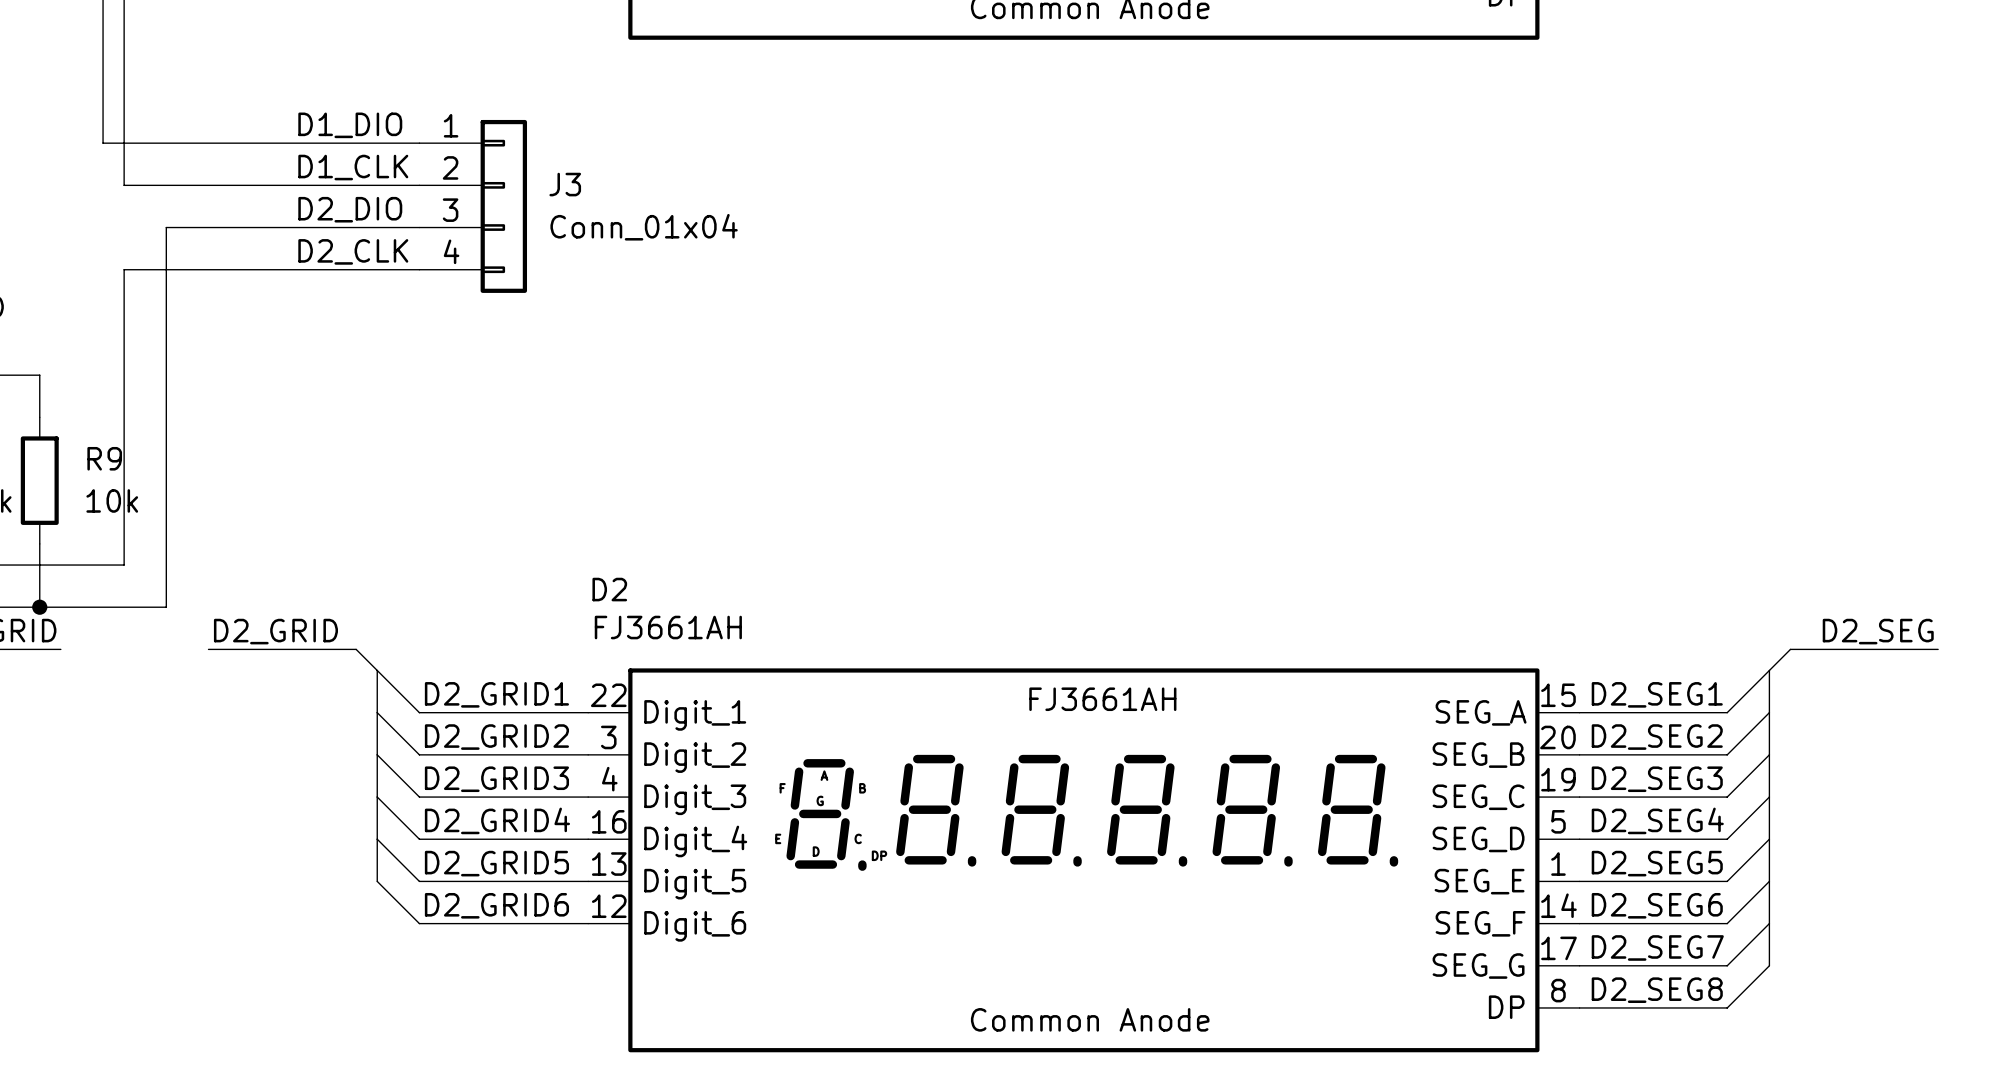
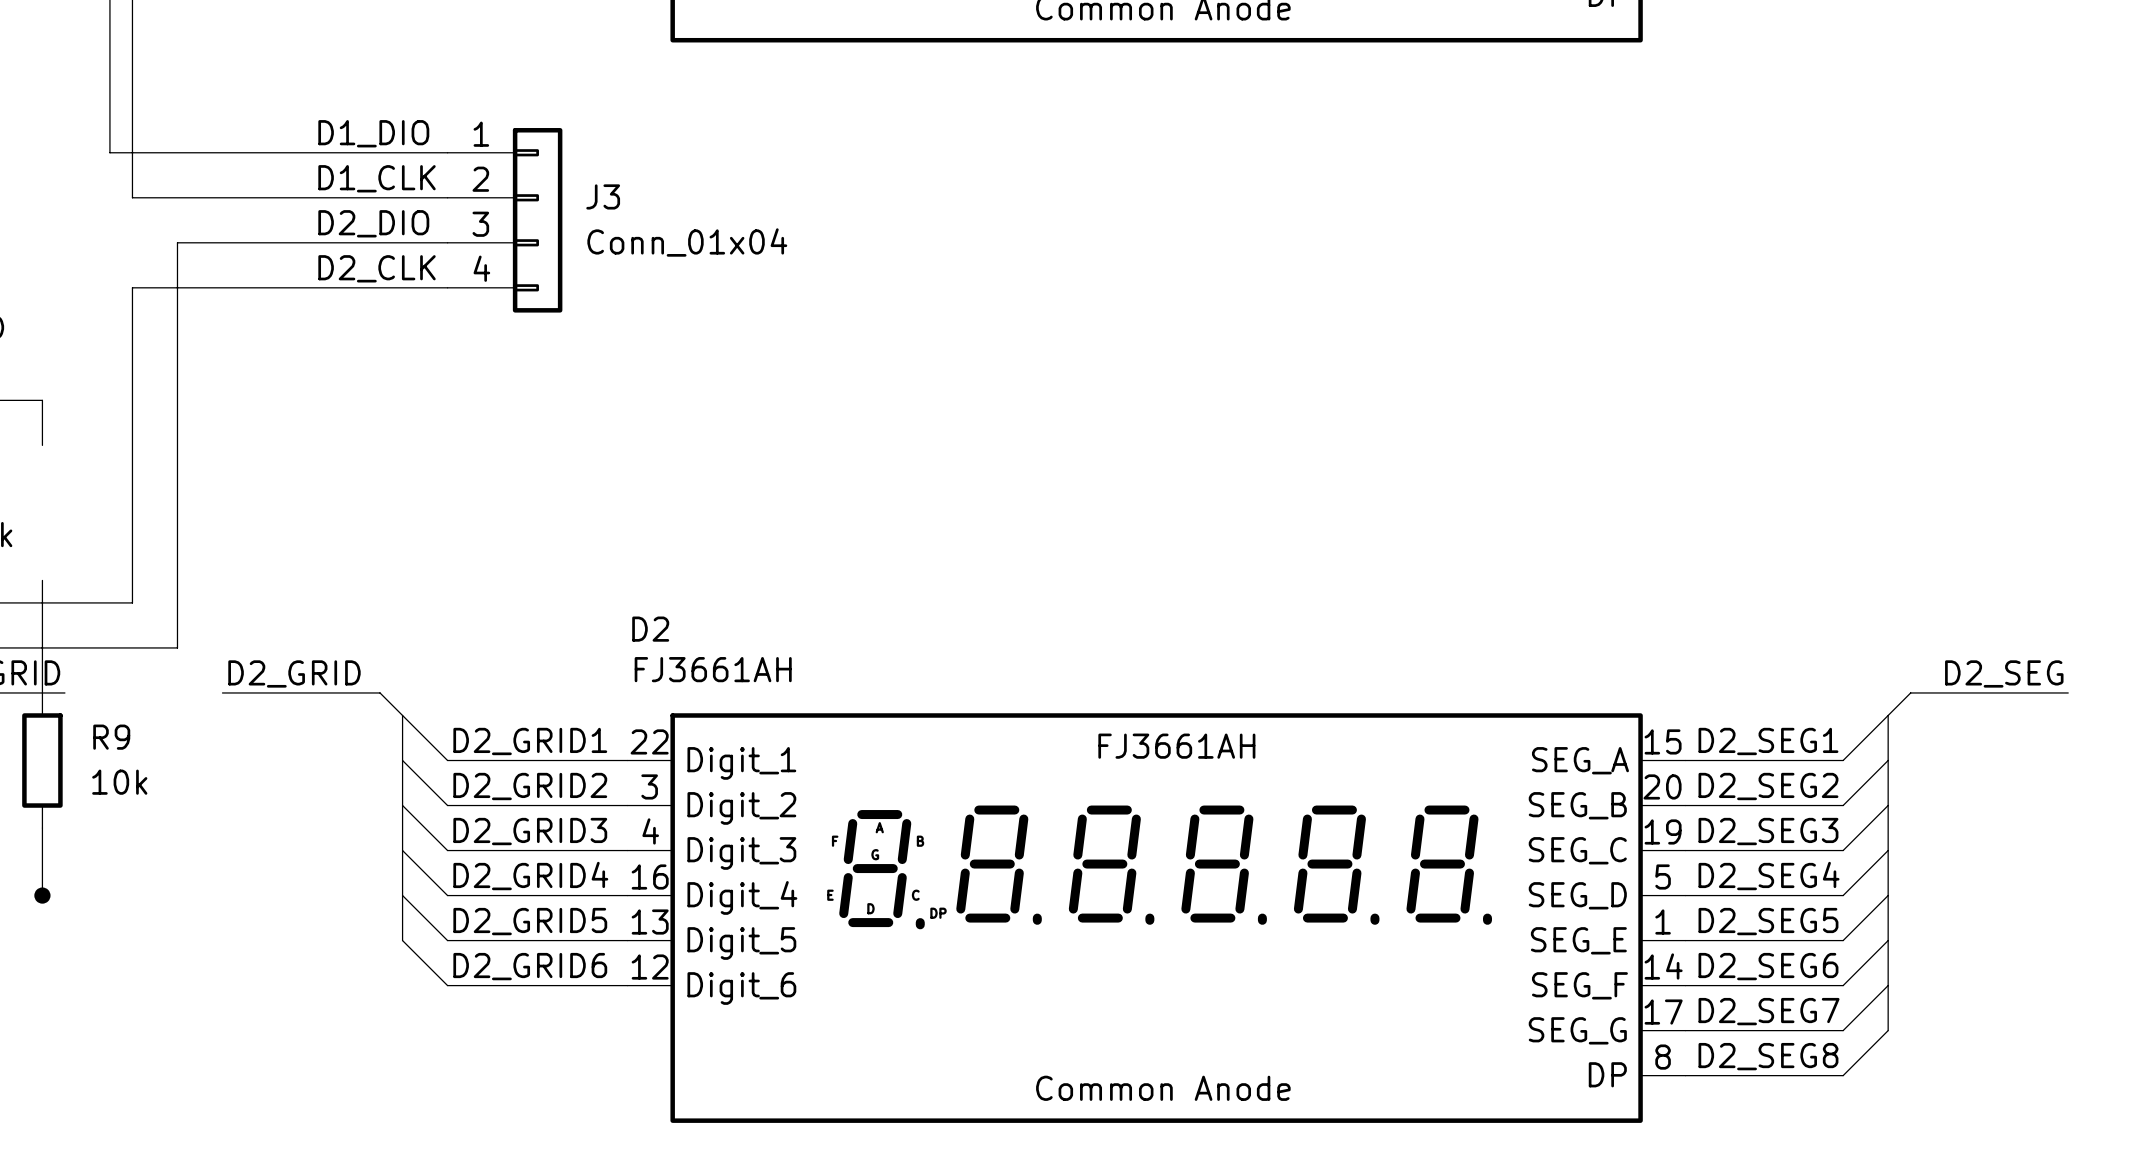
R9 position: (39, 480) -> (42, 760)
wire: none -> (42, 647) (42, 692)
junction: (39, 607) -> none
wire: none -> (42, 828) (42, 895)
junction: none -> (42, 895)

